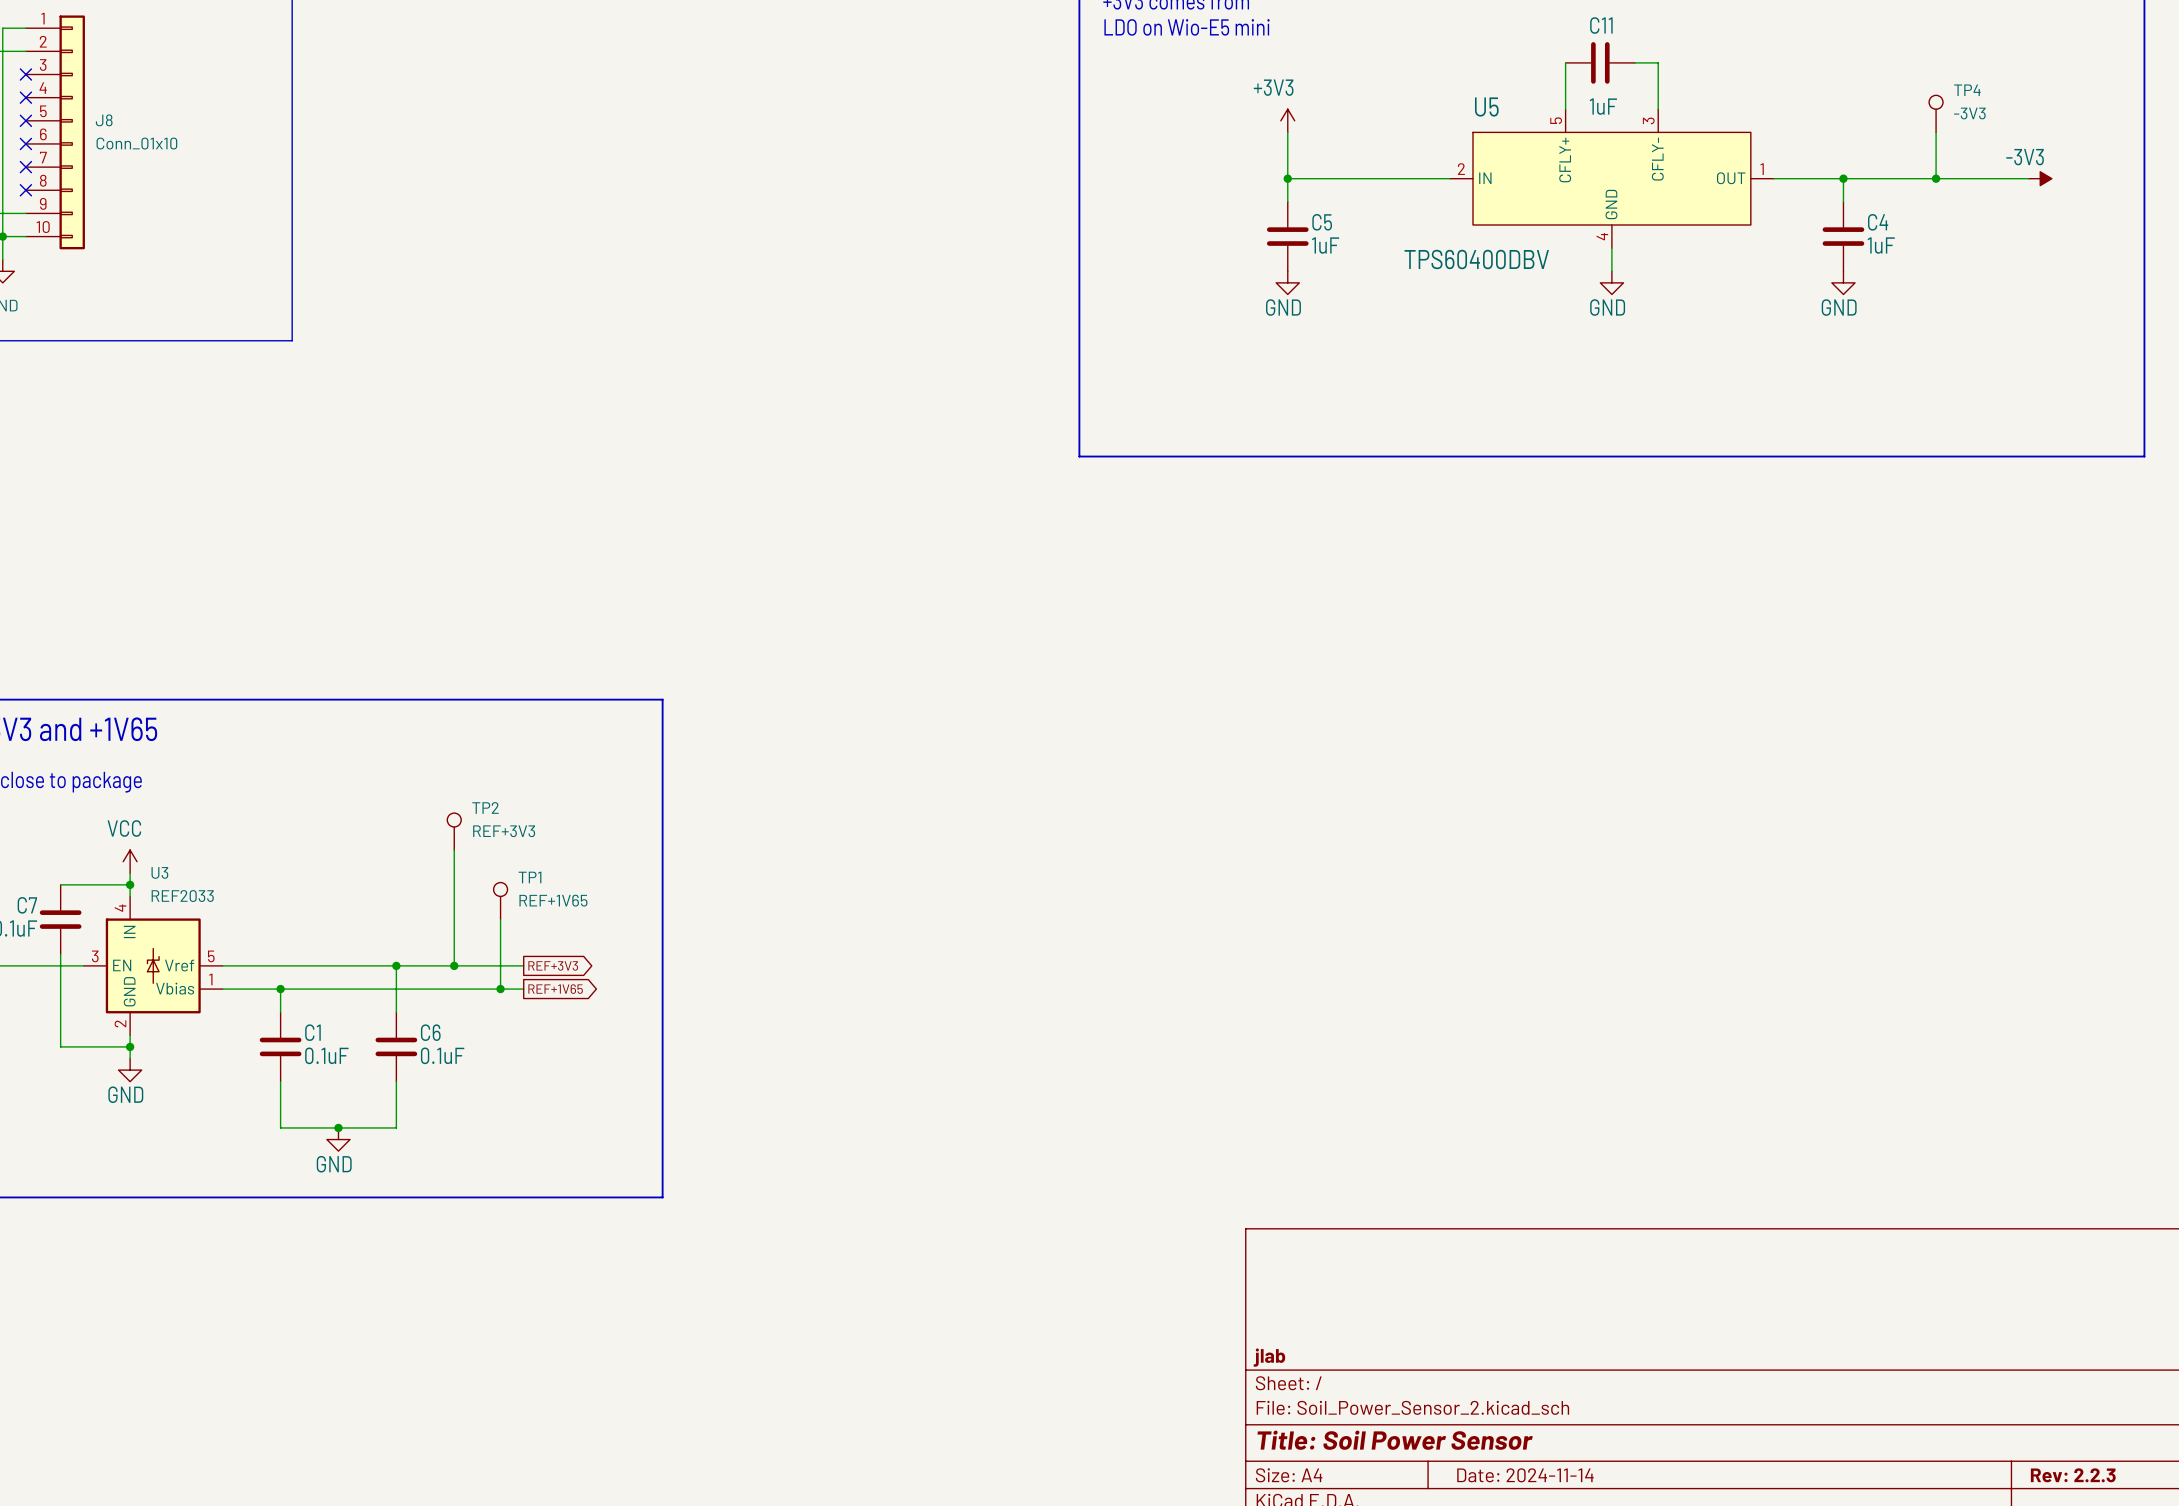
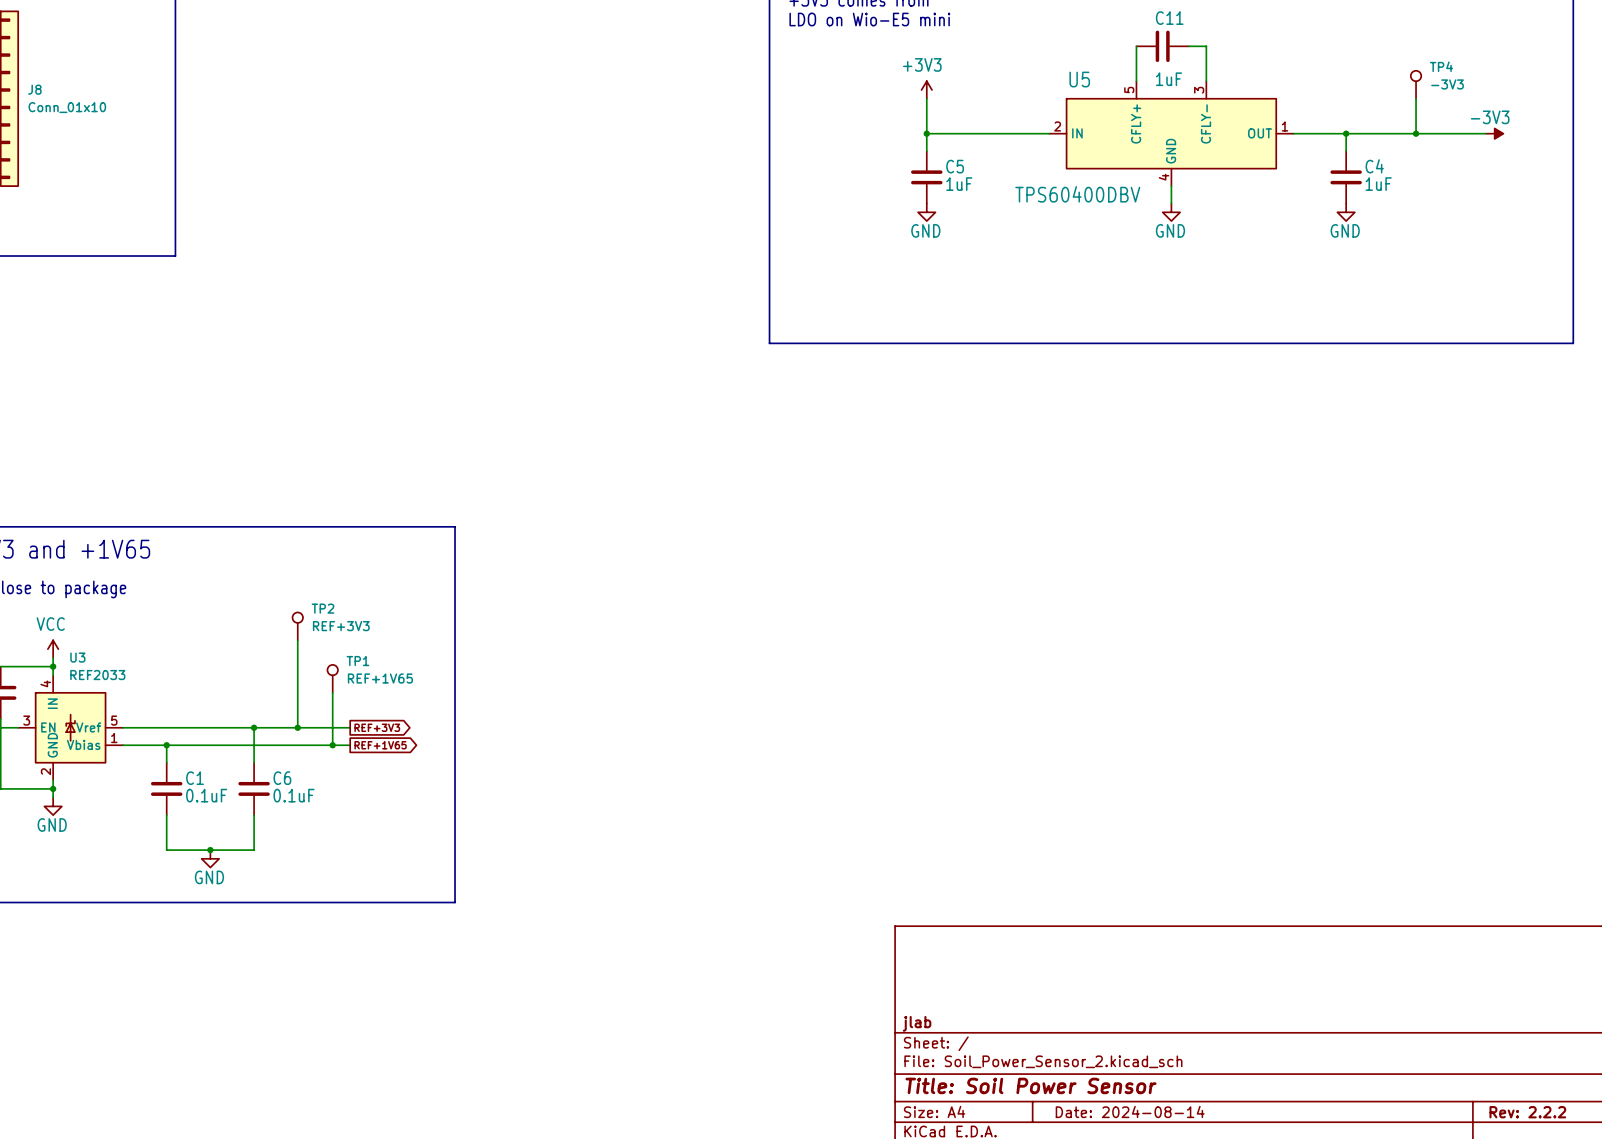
title block: Date: 2024-11-14 (1525, 1475) -> Date: 2024-08-14 (1130, 1111)
title block: Rev: 2.2.3 (2073, 1475) -> Rev: 2.2.2 (1527, 1112)

